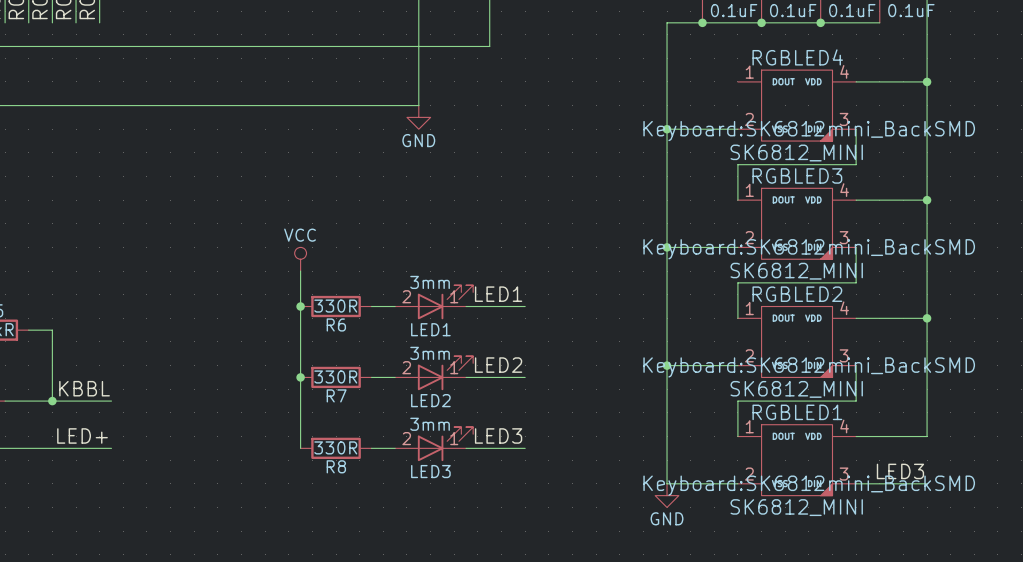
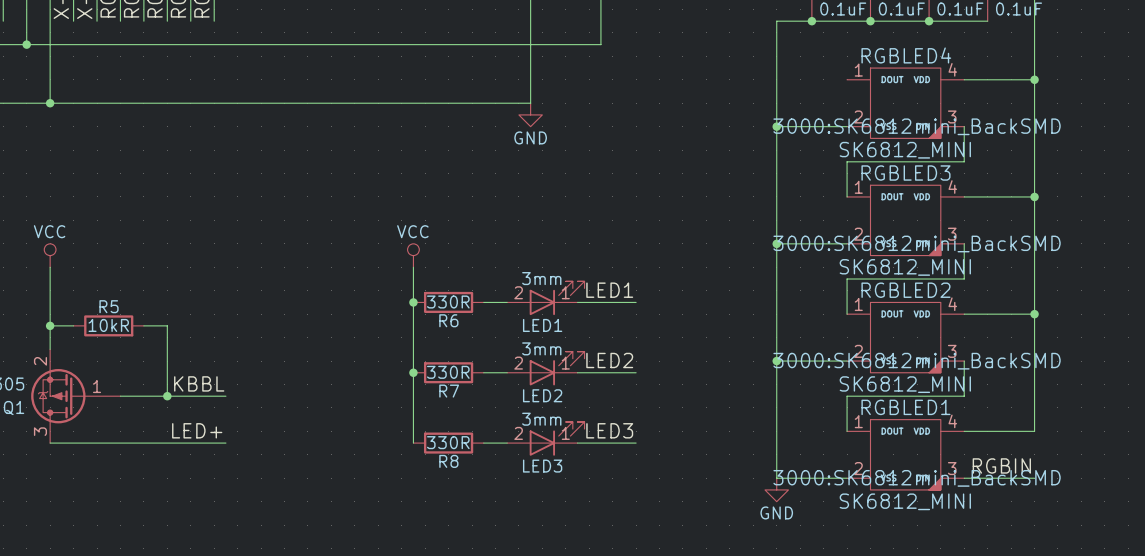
RGBLED4 text: Keyboard:SK6812mini_BackSMD (809, 131) -> 3000:SK6812mini_BackSMD (917, 126)
RGBLED3 text: Keyboard:SK6812mini_BackSMD (809, 249) -> 3000:SK6812mini_BackSMD (917, 243)
RGBLED2 text: Keyboard:SK6812mini_BackSMD (809, 367) -> 3000:SK6812mini_BackSMD (917, 361)
label: LED3 (900, 471) -> RGBIN (1001, 465)
RGBLED1 text: Keyboard:SK6812mini_BackSMD (809, 485) -> 3000:SK6812mini_BackSMD (917, 478)

